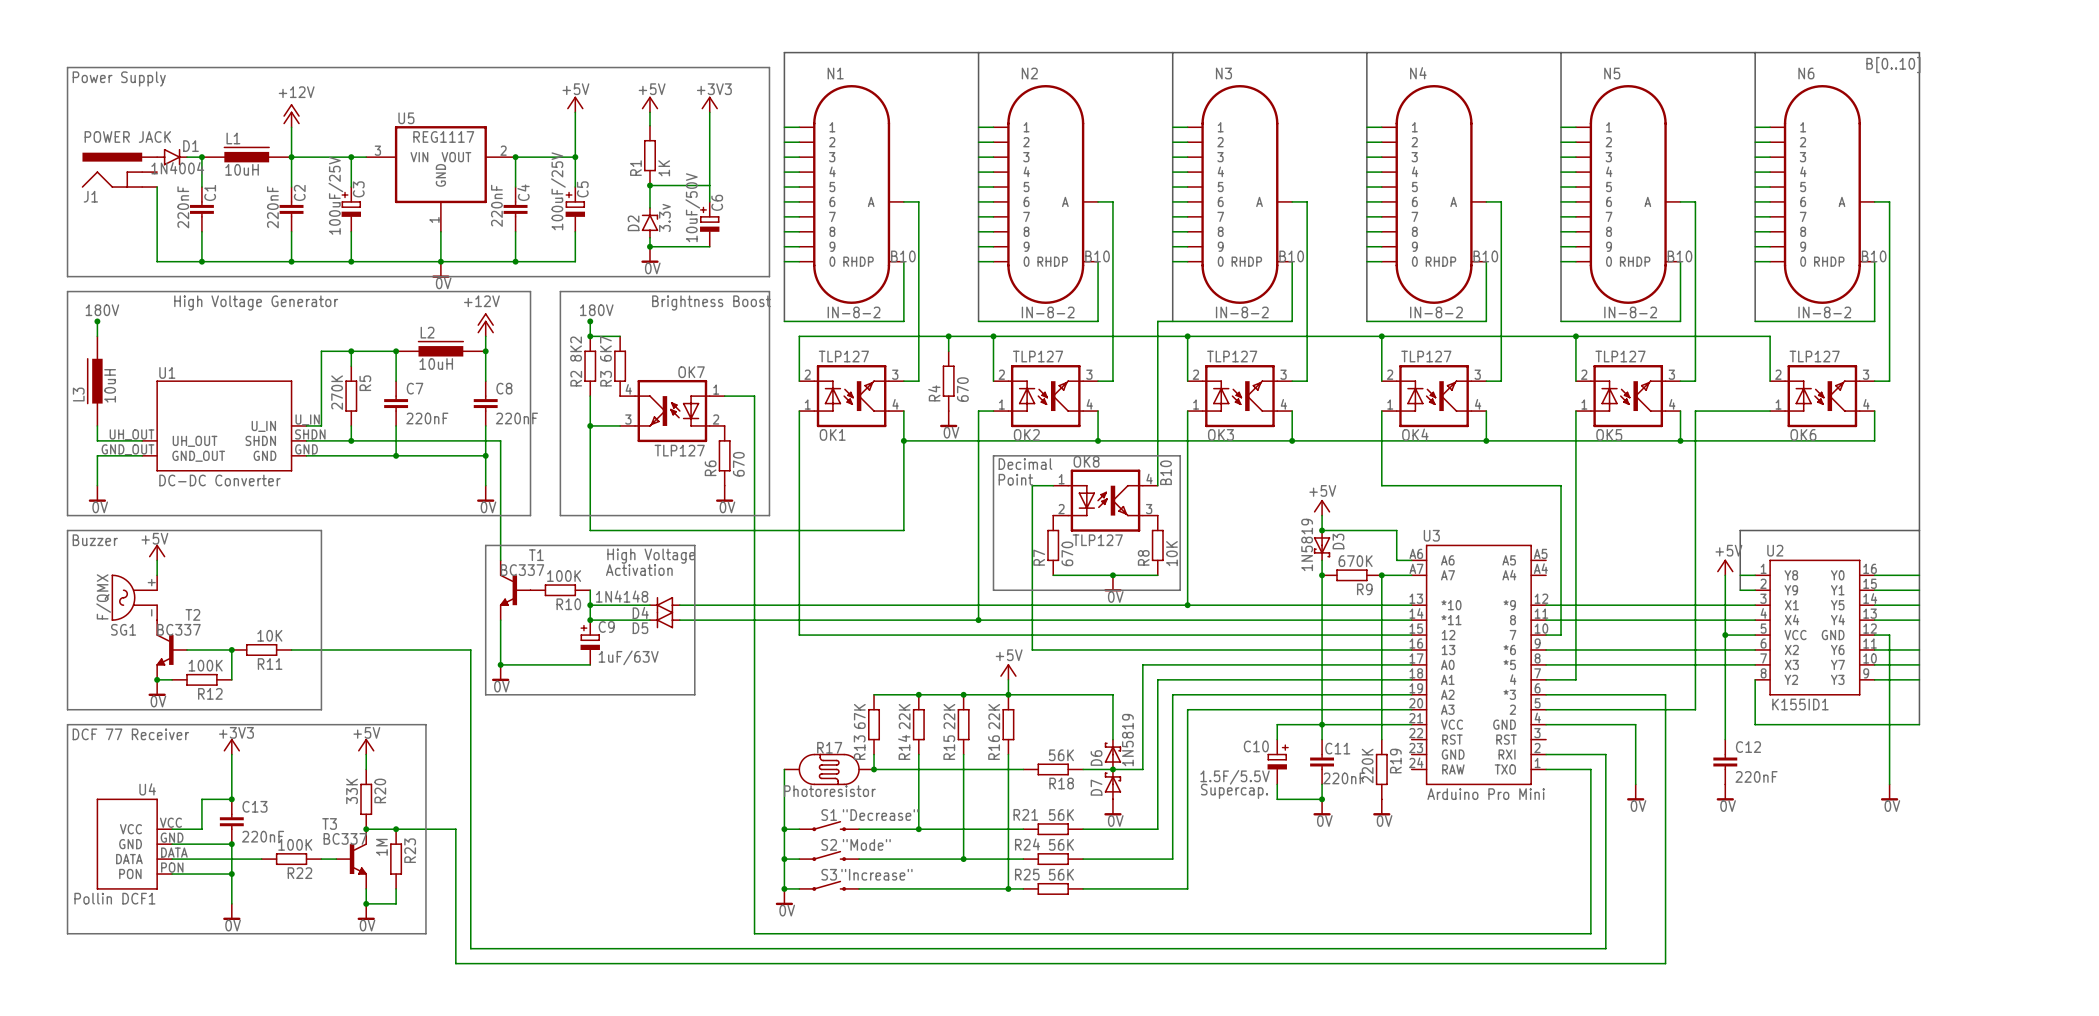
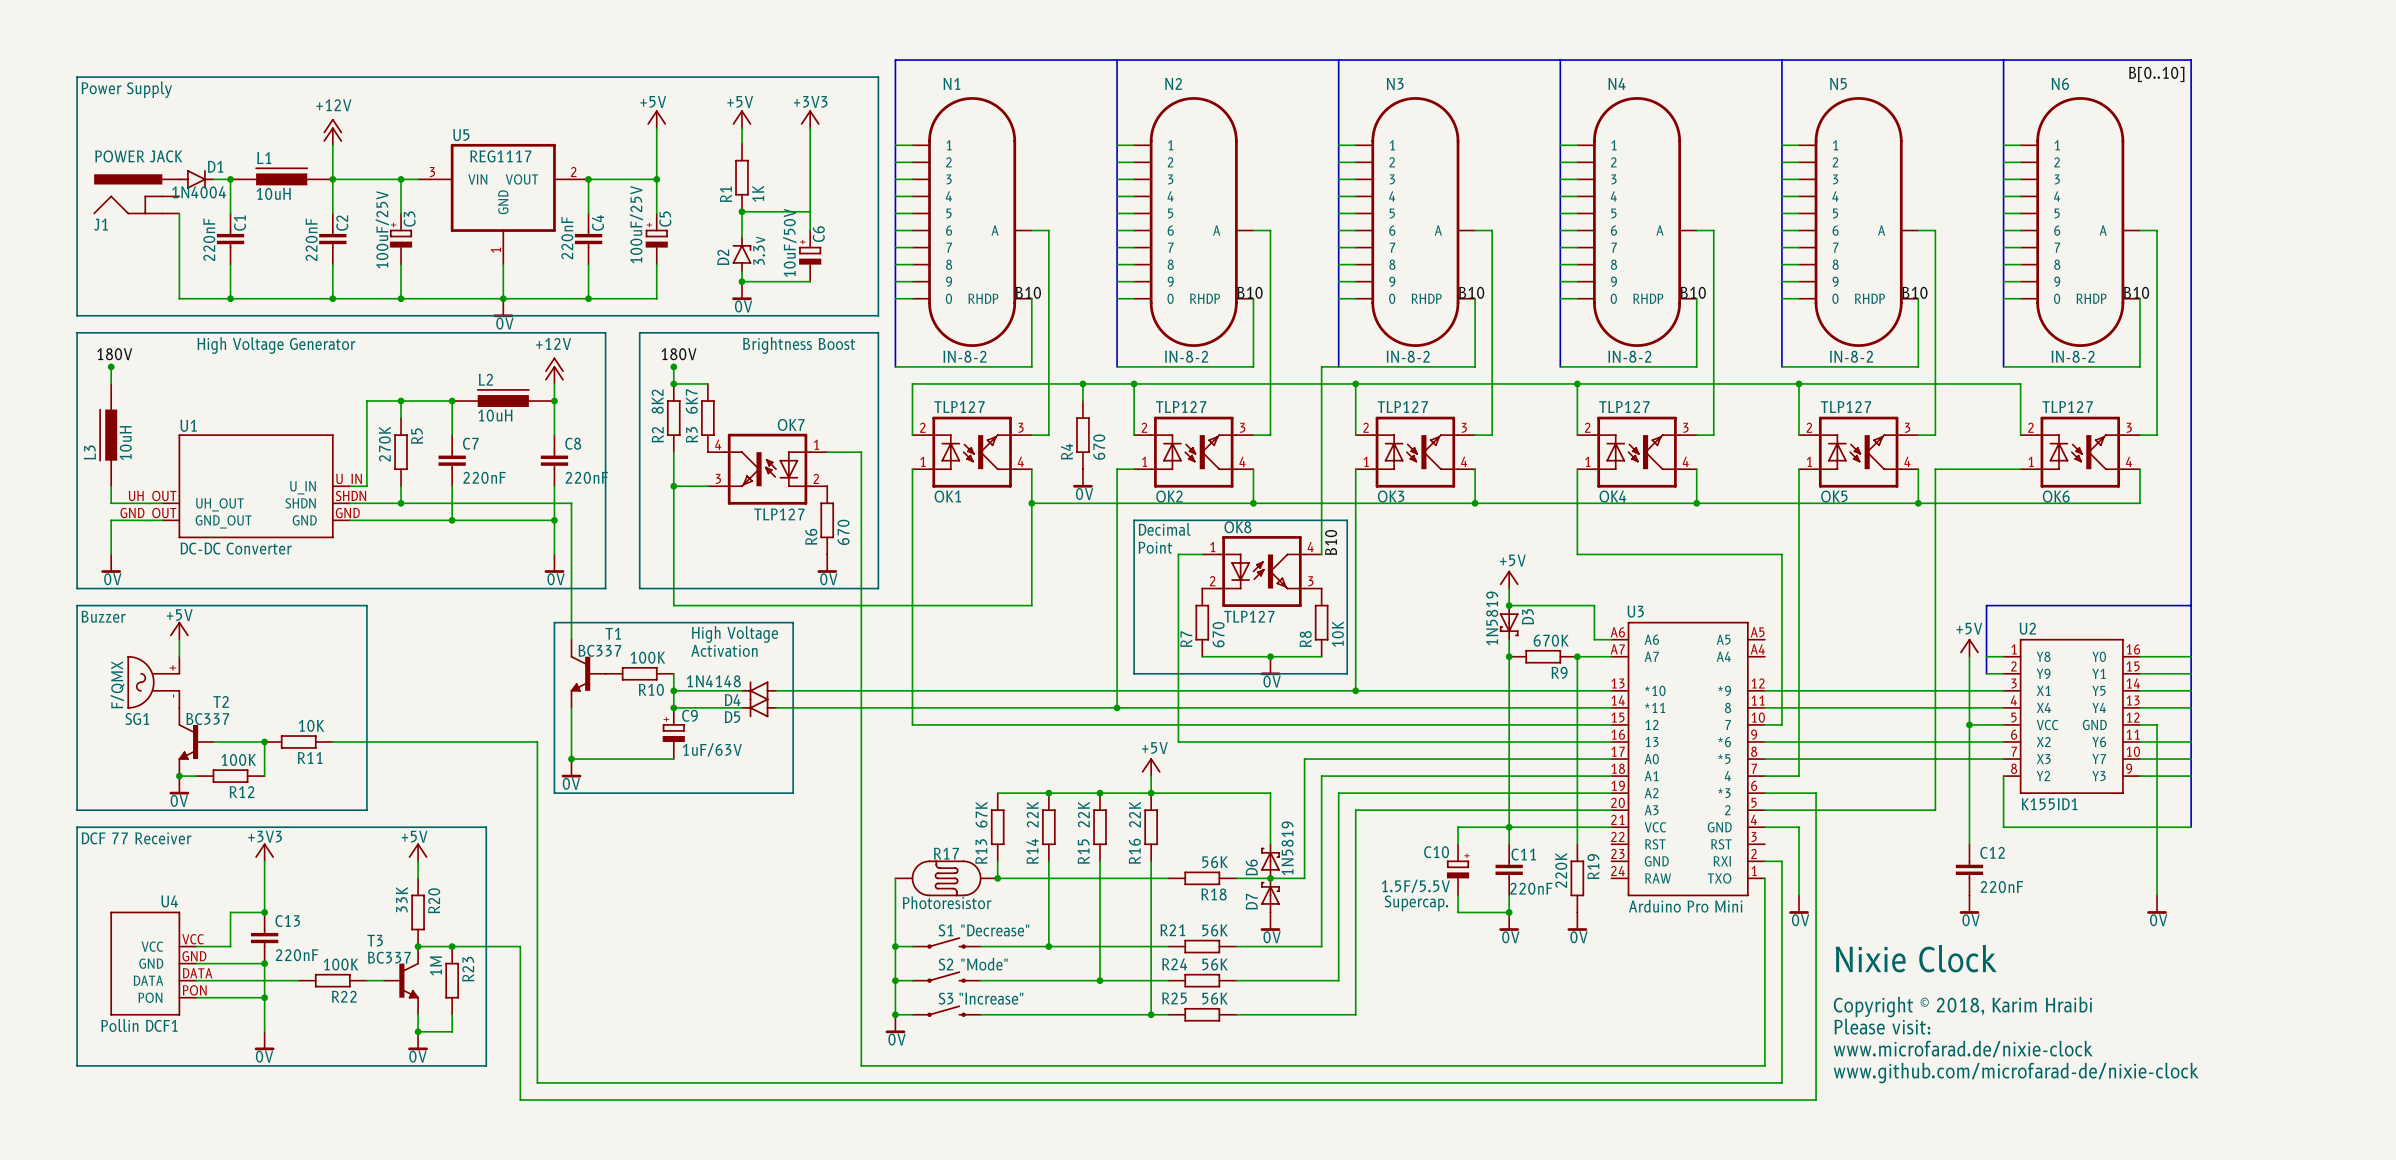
wire: (1590, 694) (1665, 694) (1665, 963) (1590, 963) -> none
wire: (1575, 724) (1635, 724) (1635, 784) -> (1798, 827) (1798, 895)
wire: (1561, 754) (1605, 754) (1605, 948) (1561, 948) -> (1781, 861) (1781, 1082)
wire: (1546, 769) (1590, 769) -> (1816, 793) (1816, 878)
wire: none -> (1764, 878) (1764, 1065)
power symbol position: 0V (1635, 792) -> 0V (1798, 904)
text: none -> Nixie Clock (1916, 958)
text: none -> Copyright © 2018, Karim Hraibi (1962, 1007)
text: none -> Please visit: (1882, 1026)
text: none -> www.microfarad.de/nixie-clock (1963, 1049)
wire: (1546, 933) (1590, 933) -> (1816, 1100) (1816, 1065)
text: none -> www.github.com/microfarad-de/nixie-clock (2016, 1073)

